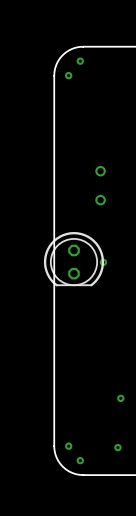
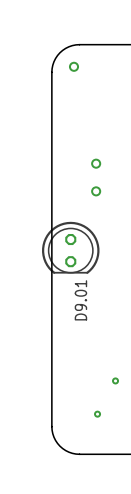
via: (80, 61) -> none
via: none -> (74, 66)
via: (68, 75) -> none
via: (103, 262) -> none
D9.01 name: none -> D9.01 (80, 300)
via: none -> (97, 414)
via: (68, 446) -> none
via: (117, 447) -> none
via: (80, 460) -> none

